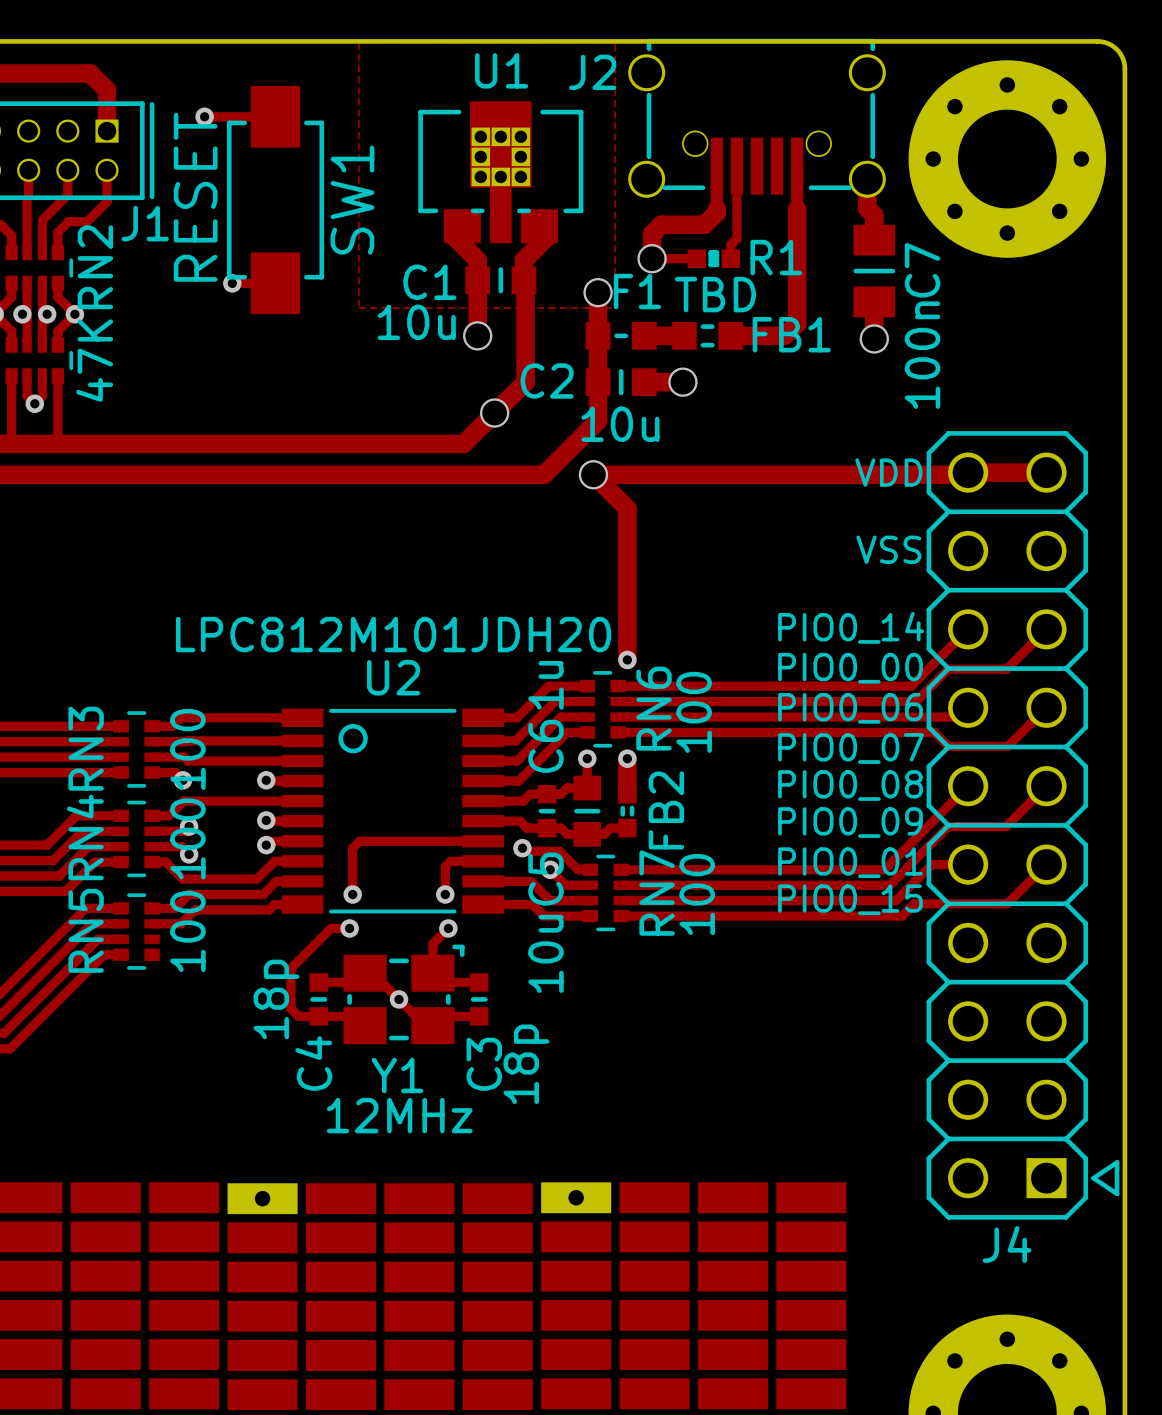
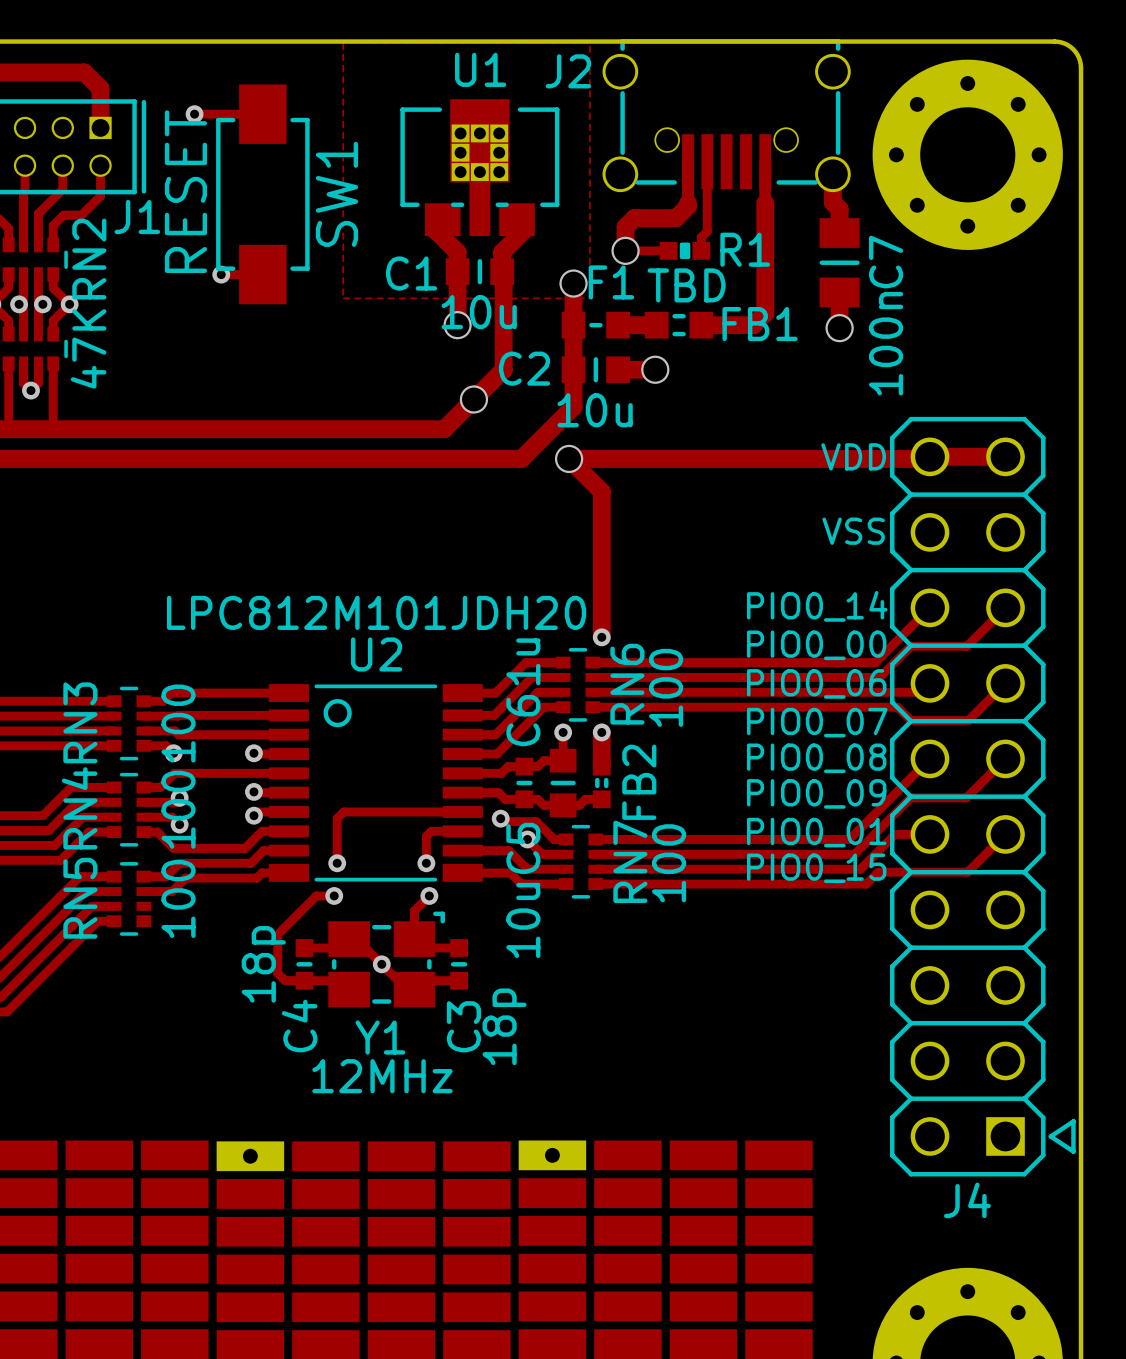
C1 value position: 10u (416, 322) -> 10u (479, 312)

